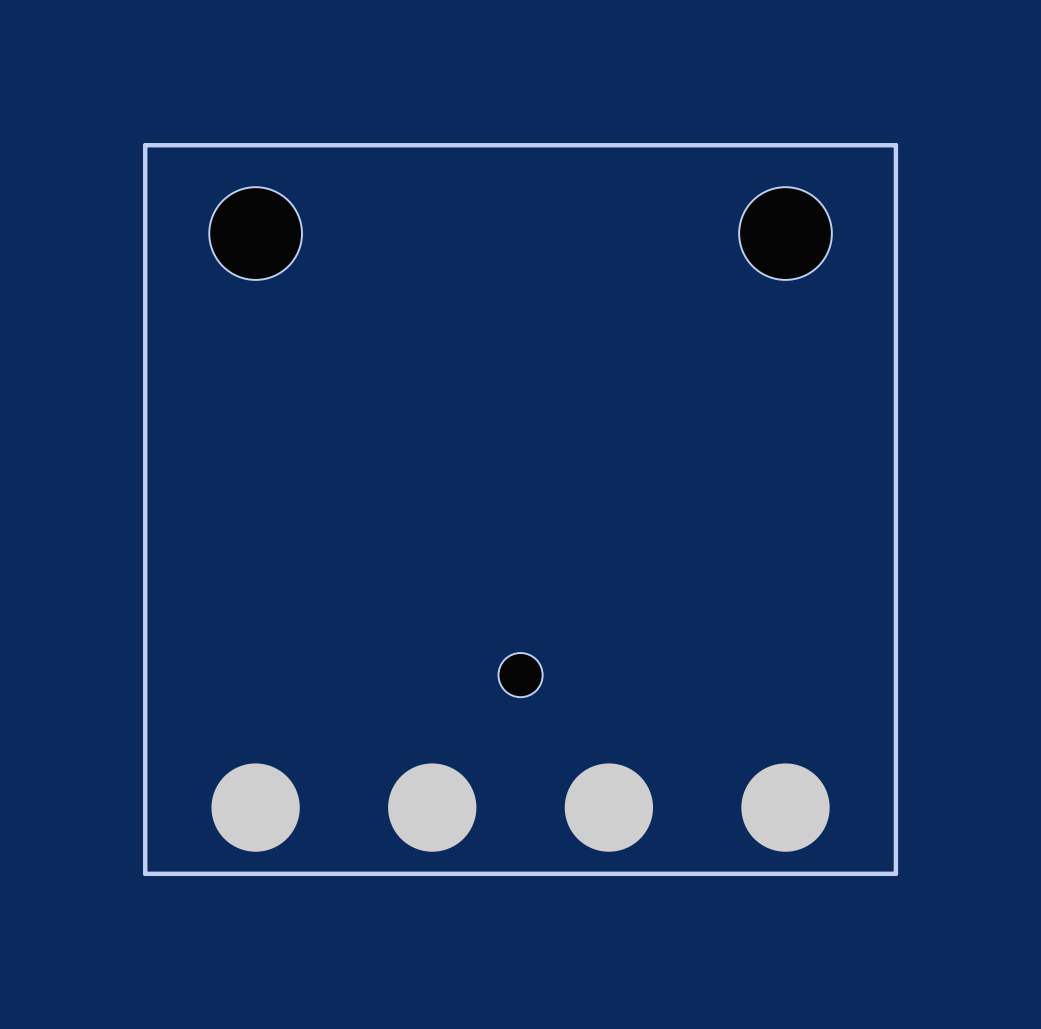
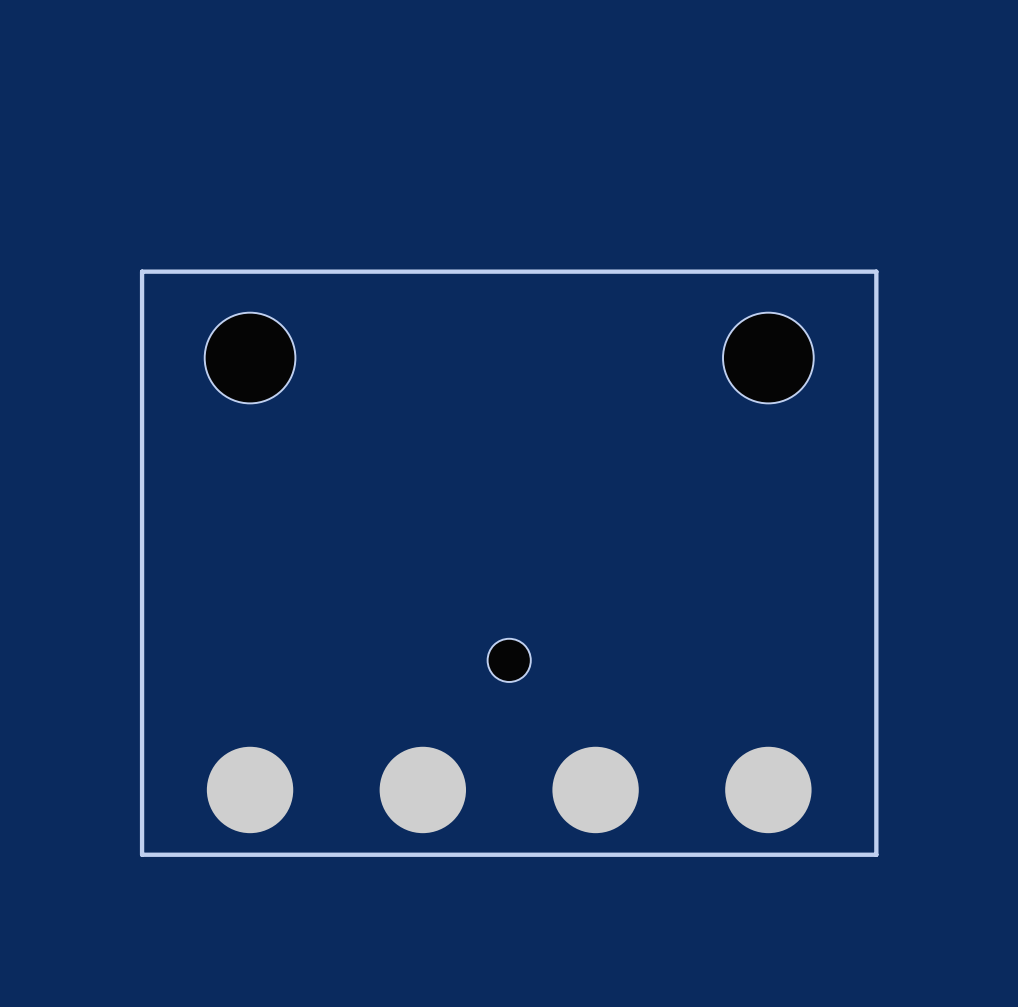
part position: (255, 233) -> (250, 358)
part position: (785, 233) -> (768, 358)
board edge: (895, 277) (895, 145) (145, 145) (145, 277) -> (876, 271) (142, 271)

